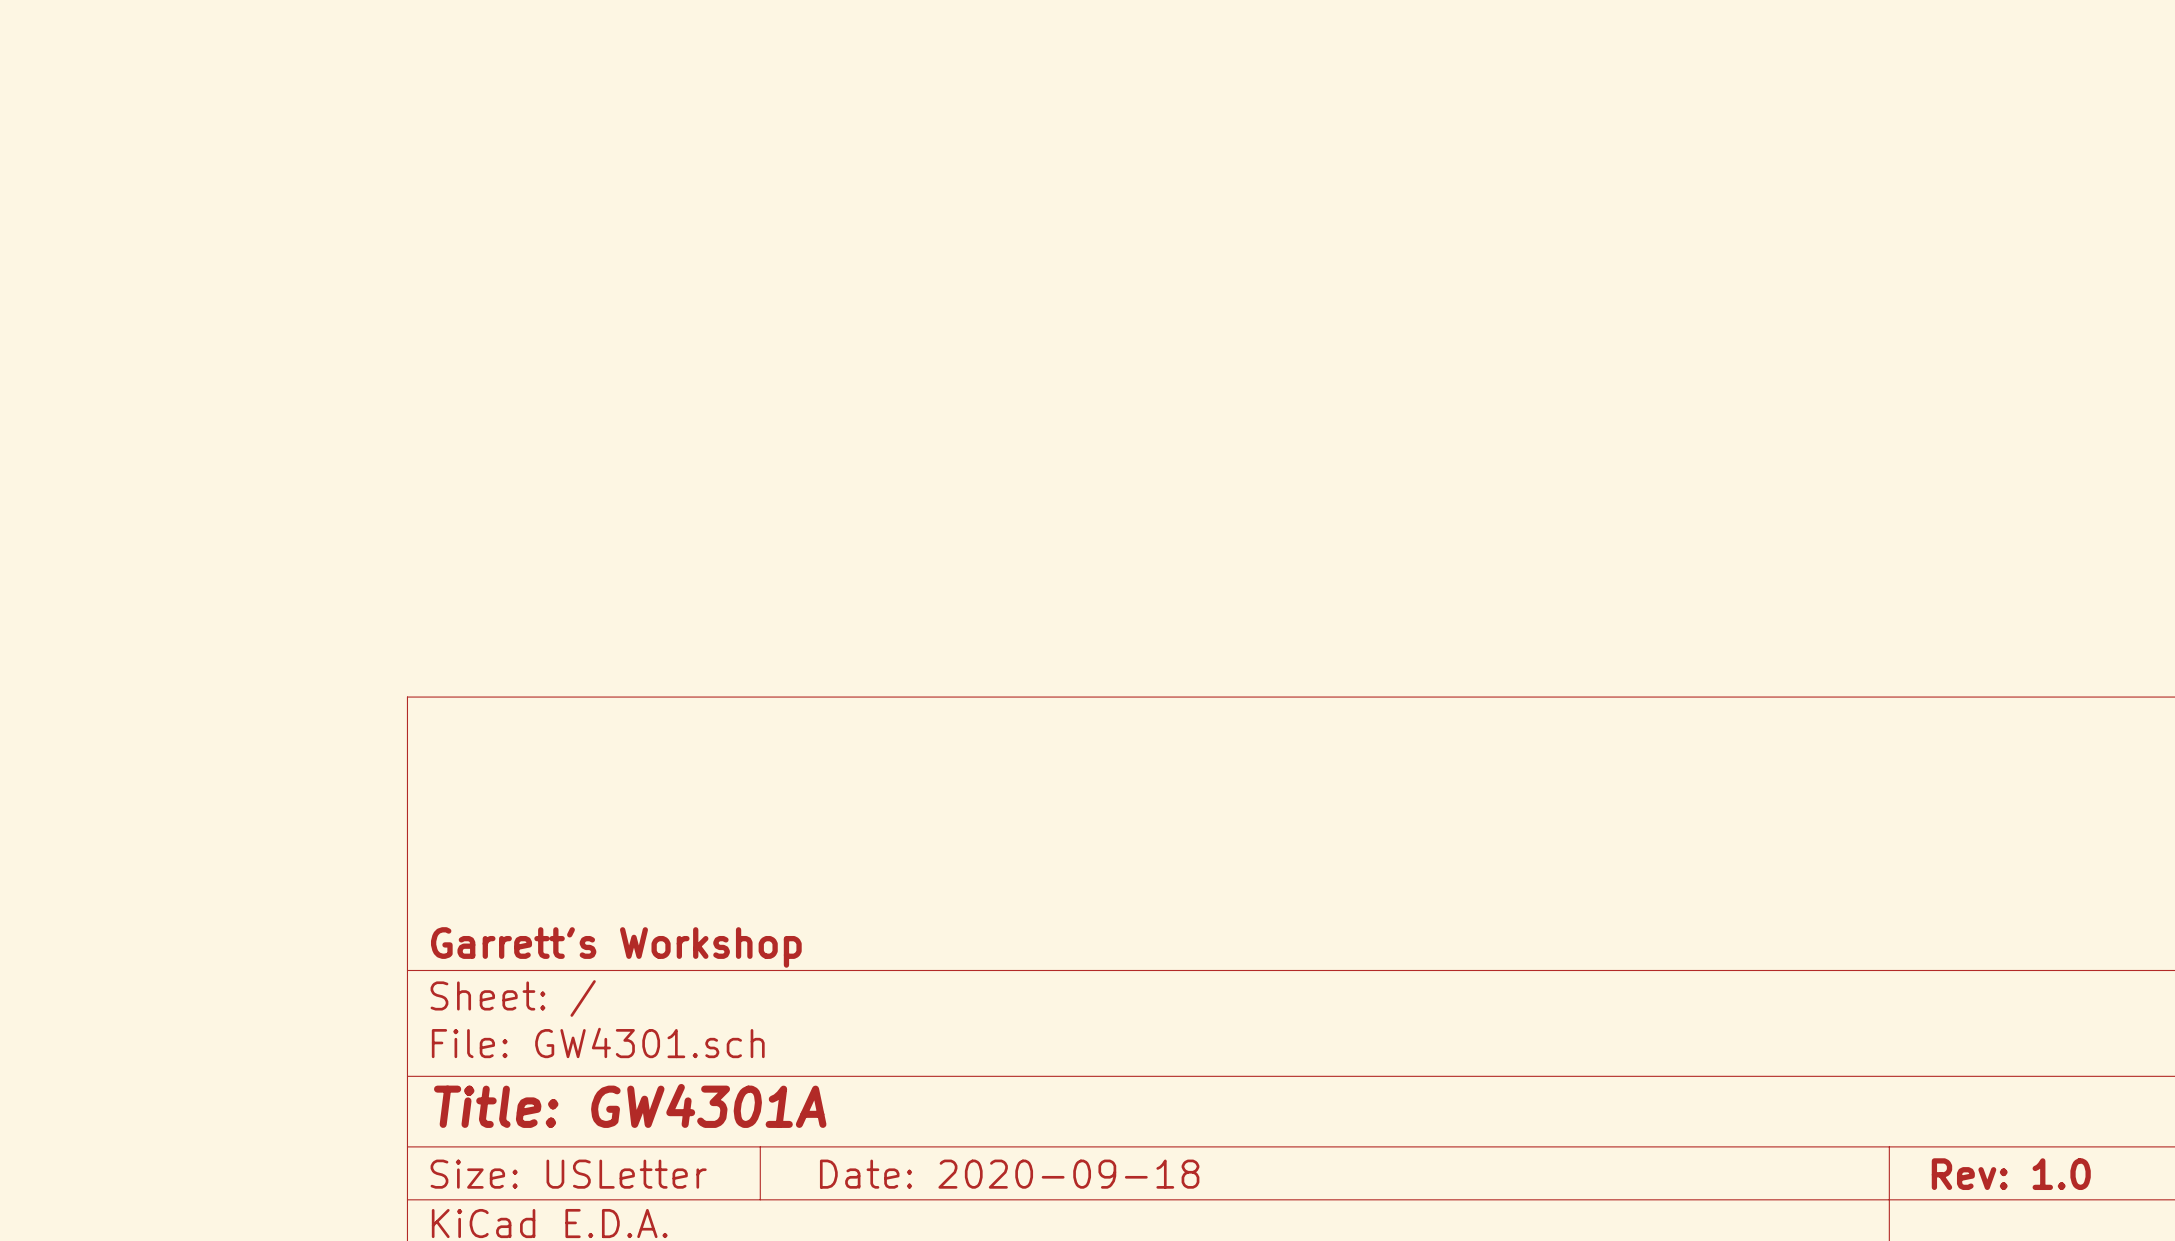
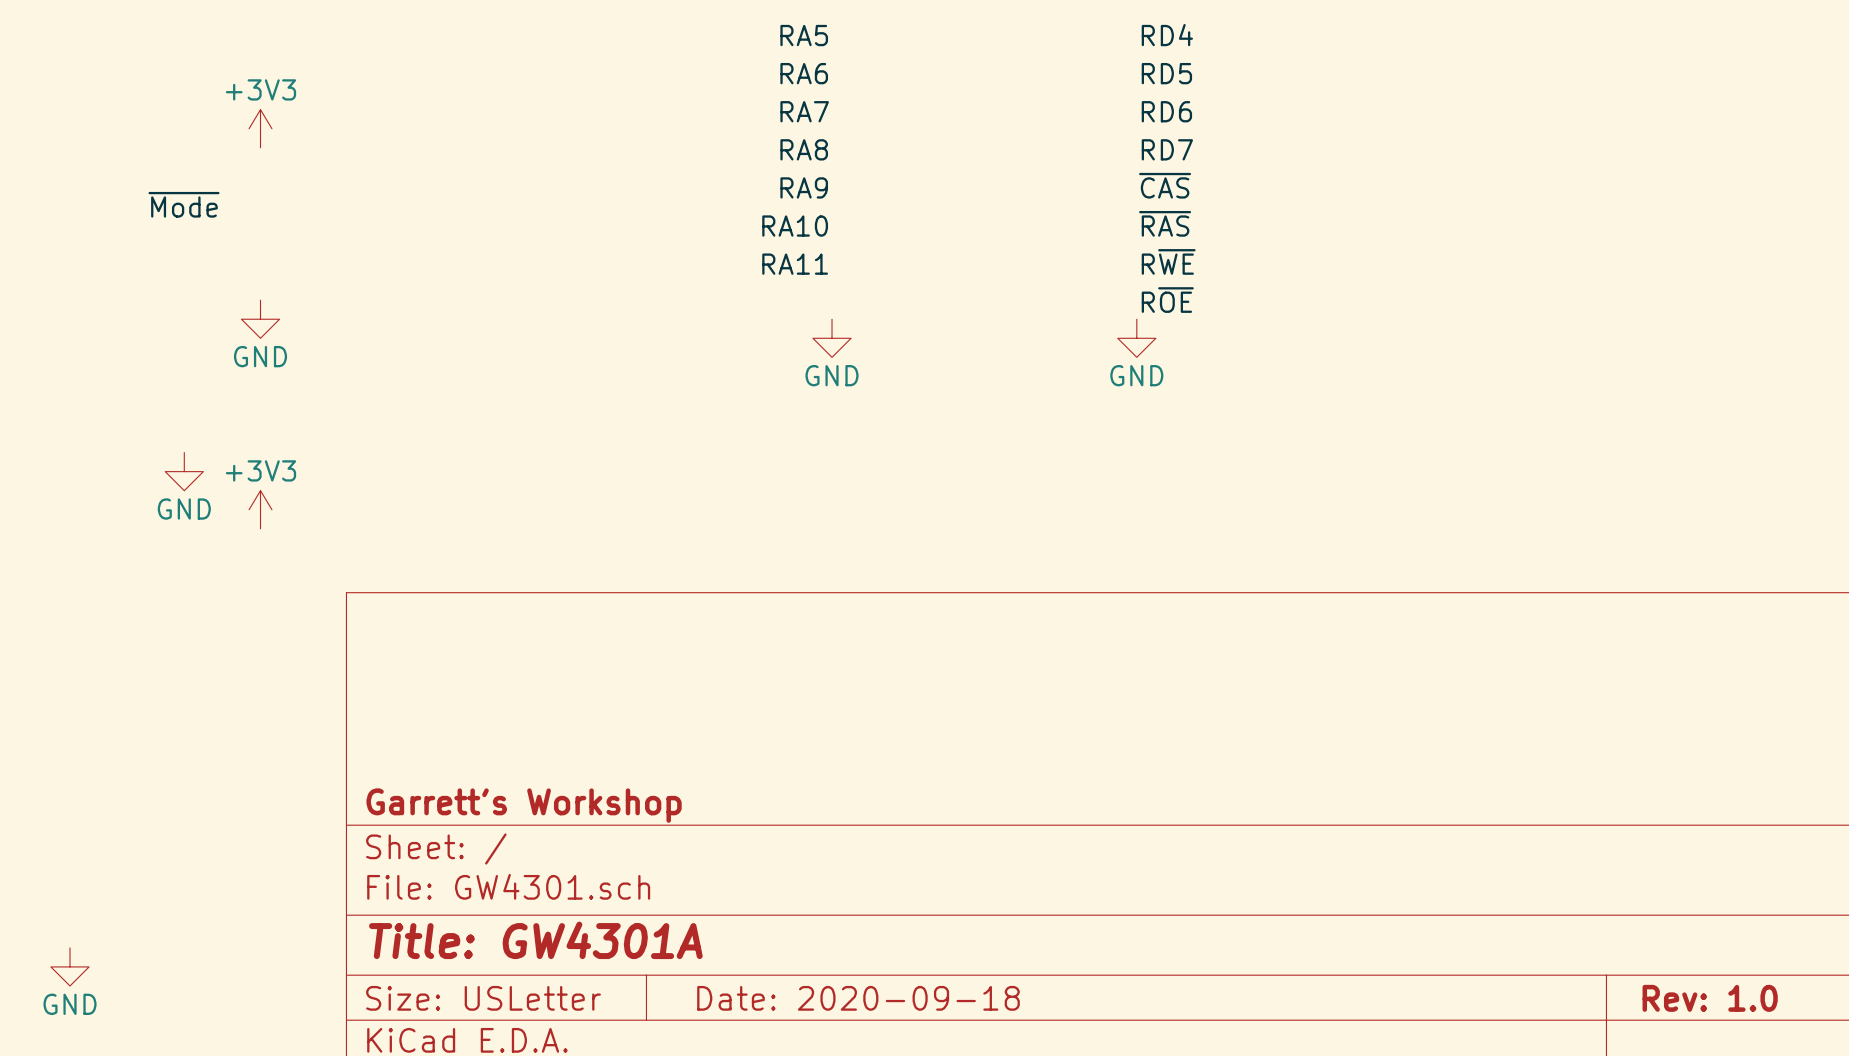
label: none -> RA5 (804, 35)
label: none -> RD4 (1167, 35)
label: none -> RA6 (804, 73)
label: none -> RD5 (1166, 73)
label: none -> RA7 (804, 111)
label: none -> RD6 (1166, 111)
power symbol: none -> +3V3 (260, 128)
label: none -> RA8 (804, 149)
label: none -> RD7 (1167, 149)
label: none -> ~{CAS} (1165, 185)
label: none -> RA9 (804, 187)
label: none -> ~{Mode} (183, 204)
label: none -> ~{RAS} (1165, 223)
label: none -> RA10 (795, 226)
label: none -> R~{WE} (1168, 261)
label: none -> RA11 (795, 264)
label: none -> R~{OE} (1167, 300)
power symbol: none -> GND (260, 319)
power symbol: none -> GND (832, 338)
power symbol: none -> GND (1136, 338)
power symbol: none -> GND (184, 471)
power symbol: none -> +3V3 (260, 509)
power symbol: none -> GND (70, 966)

